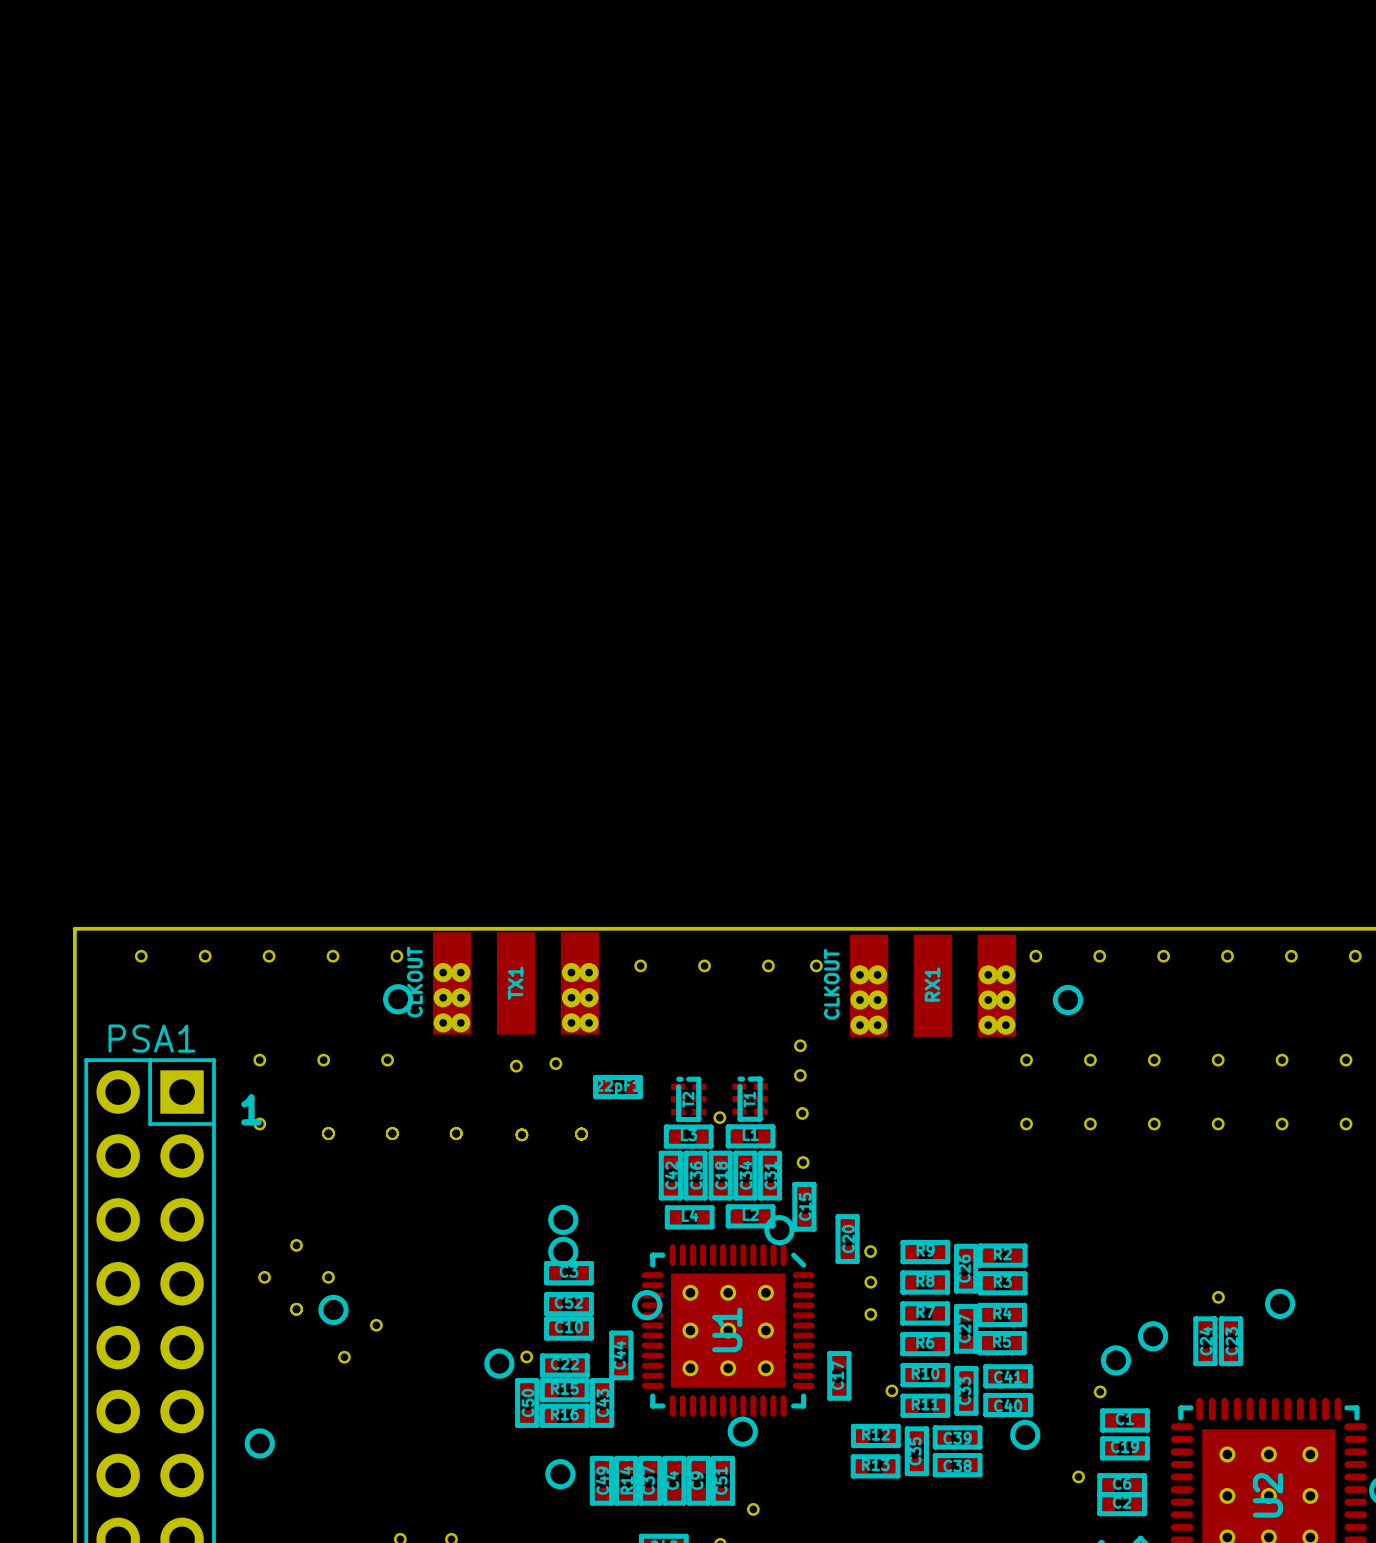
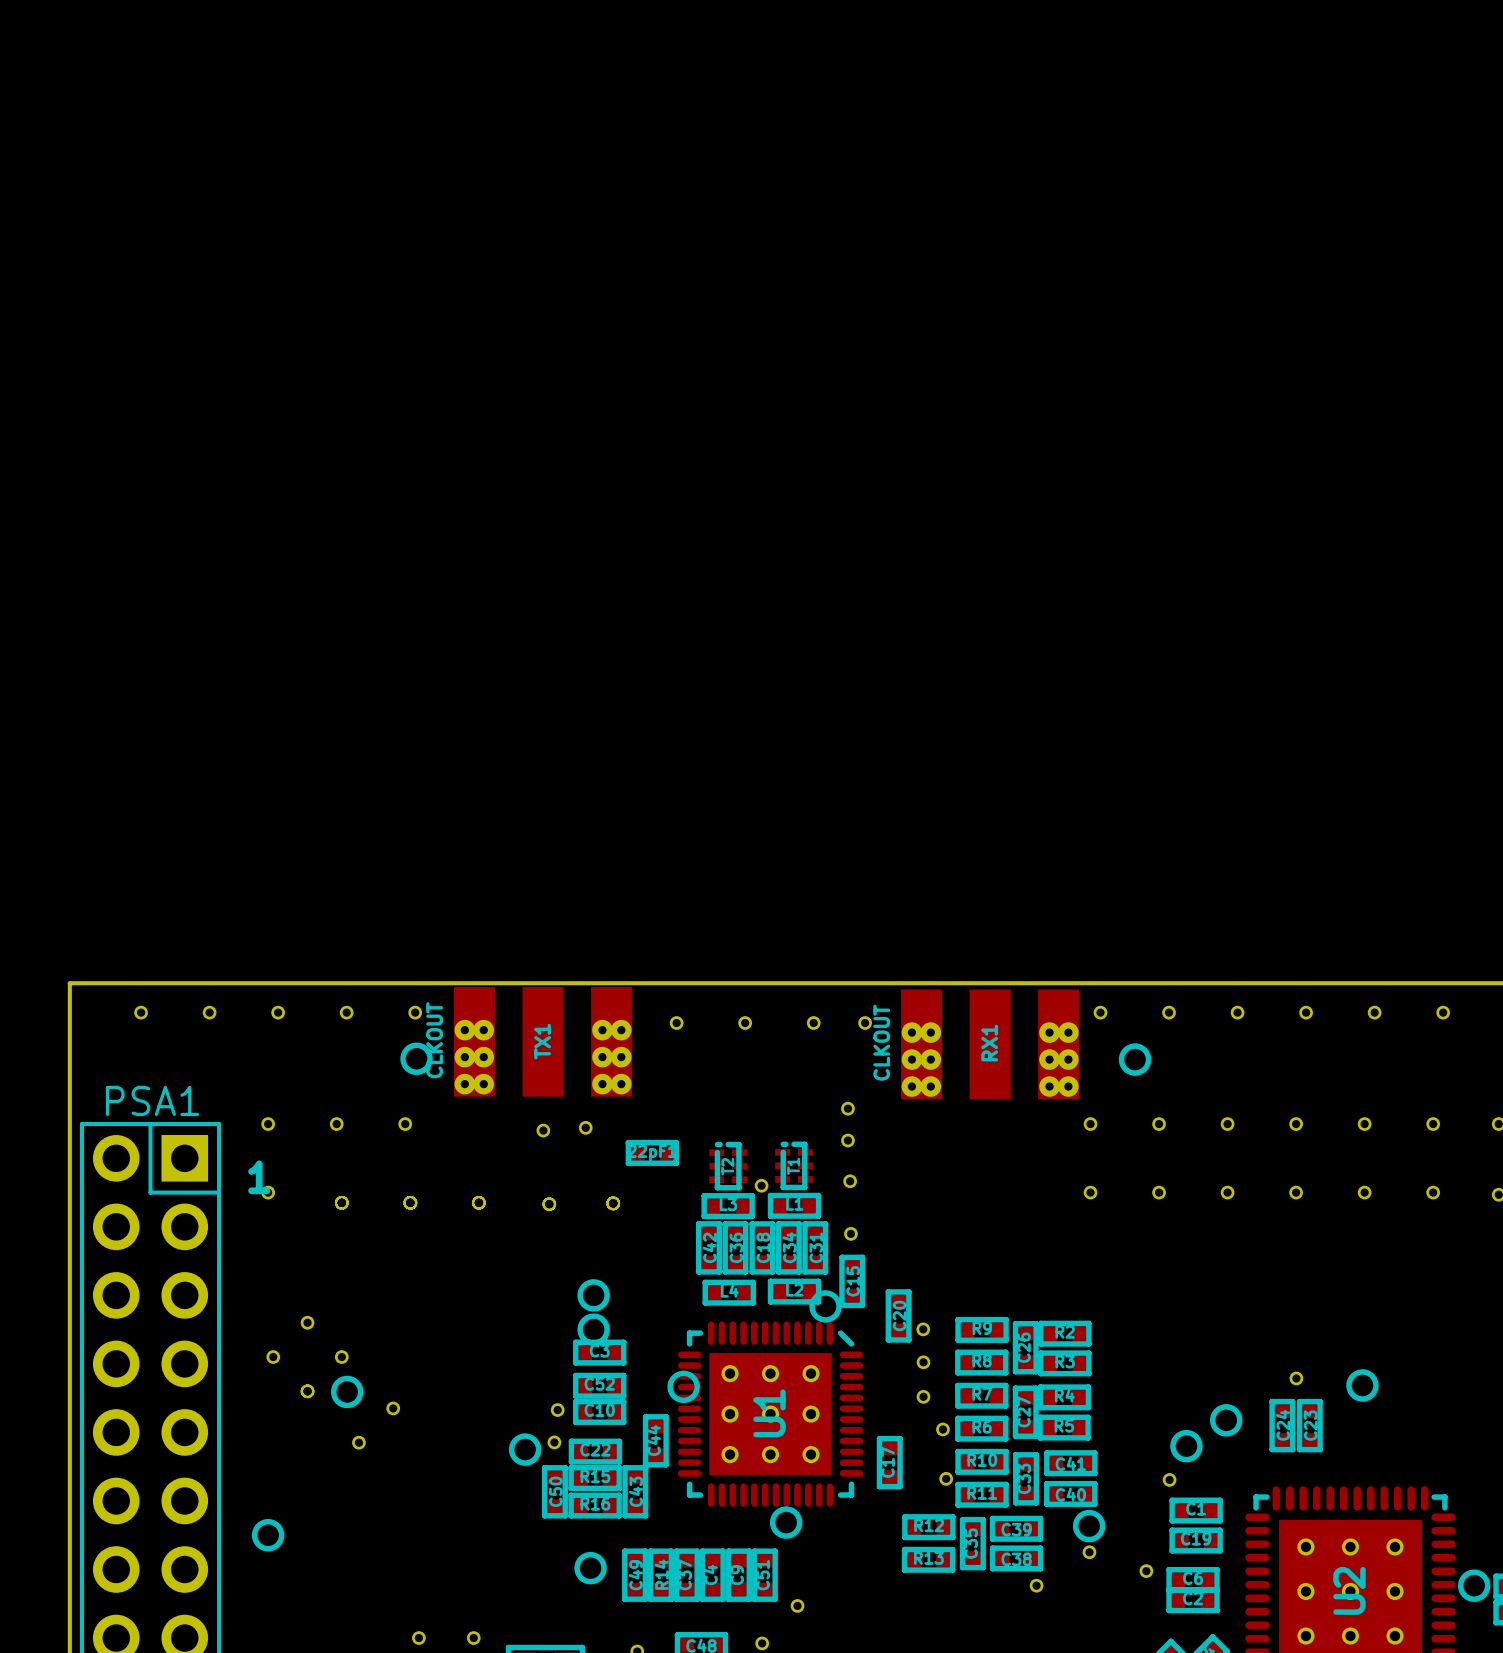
part: none -> (557, 1410)
part: none -> (942, 1429)
part: none -> (1089, 1552)
part: none -> (1036, 1585)

